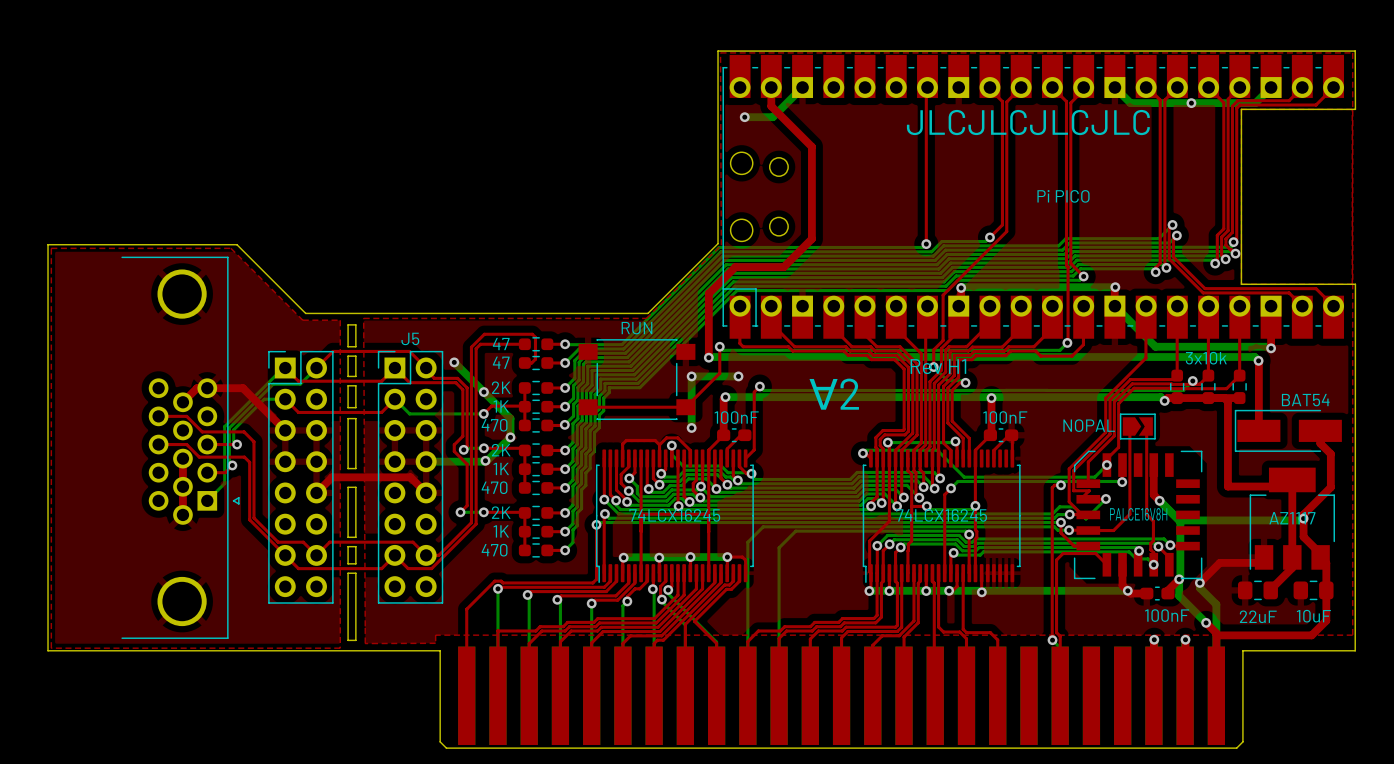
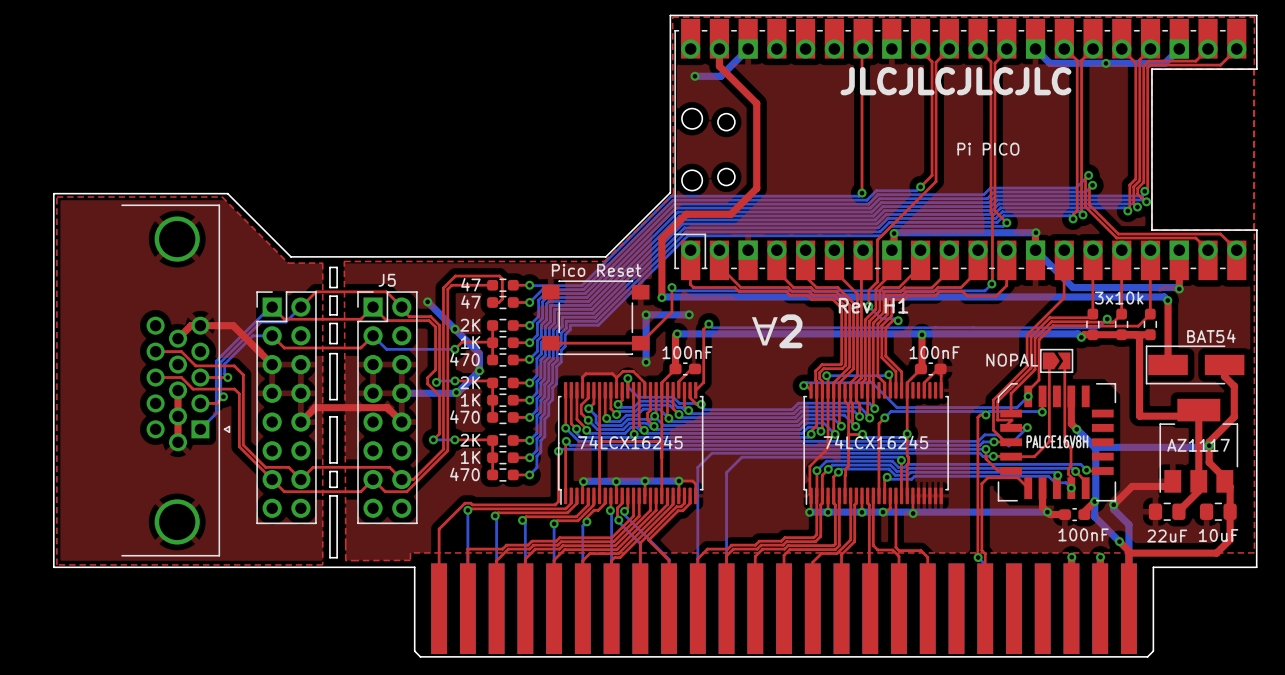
part value: RUN (637, 328) -> Pico Reset (596, 270)

